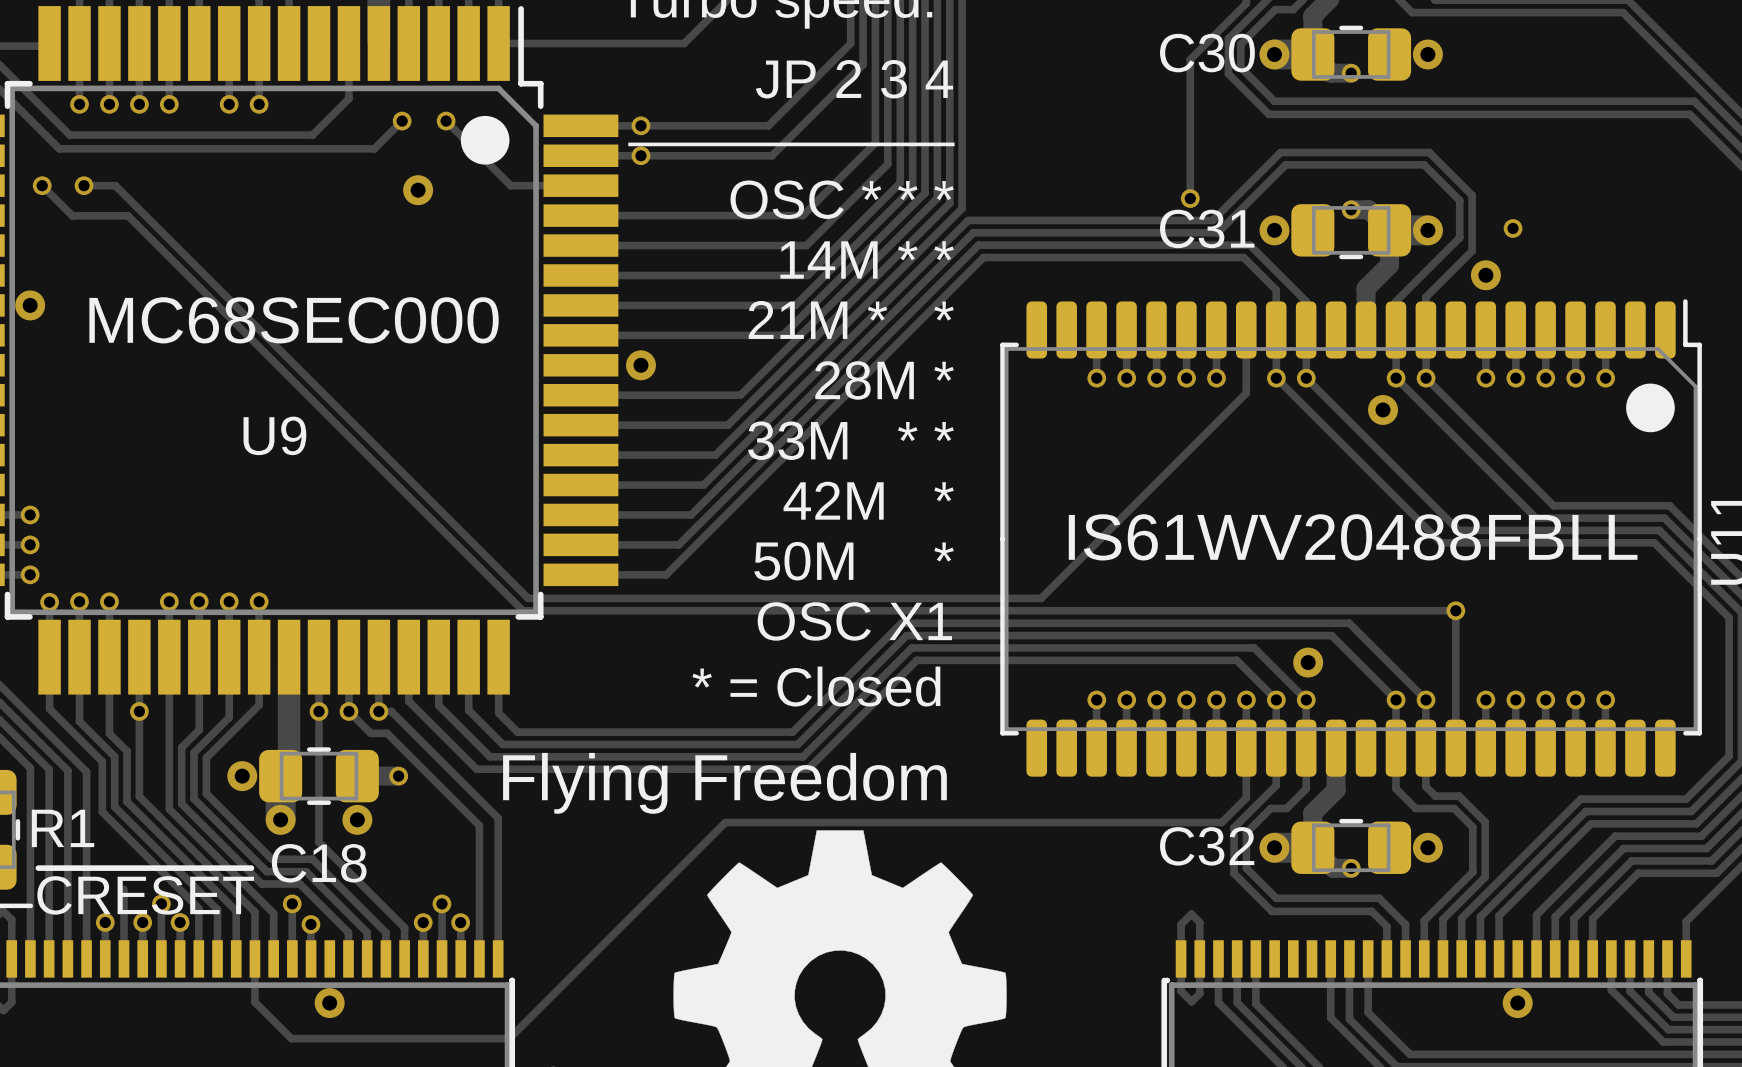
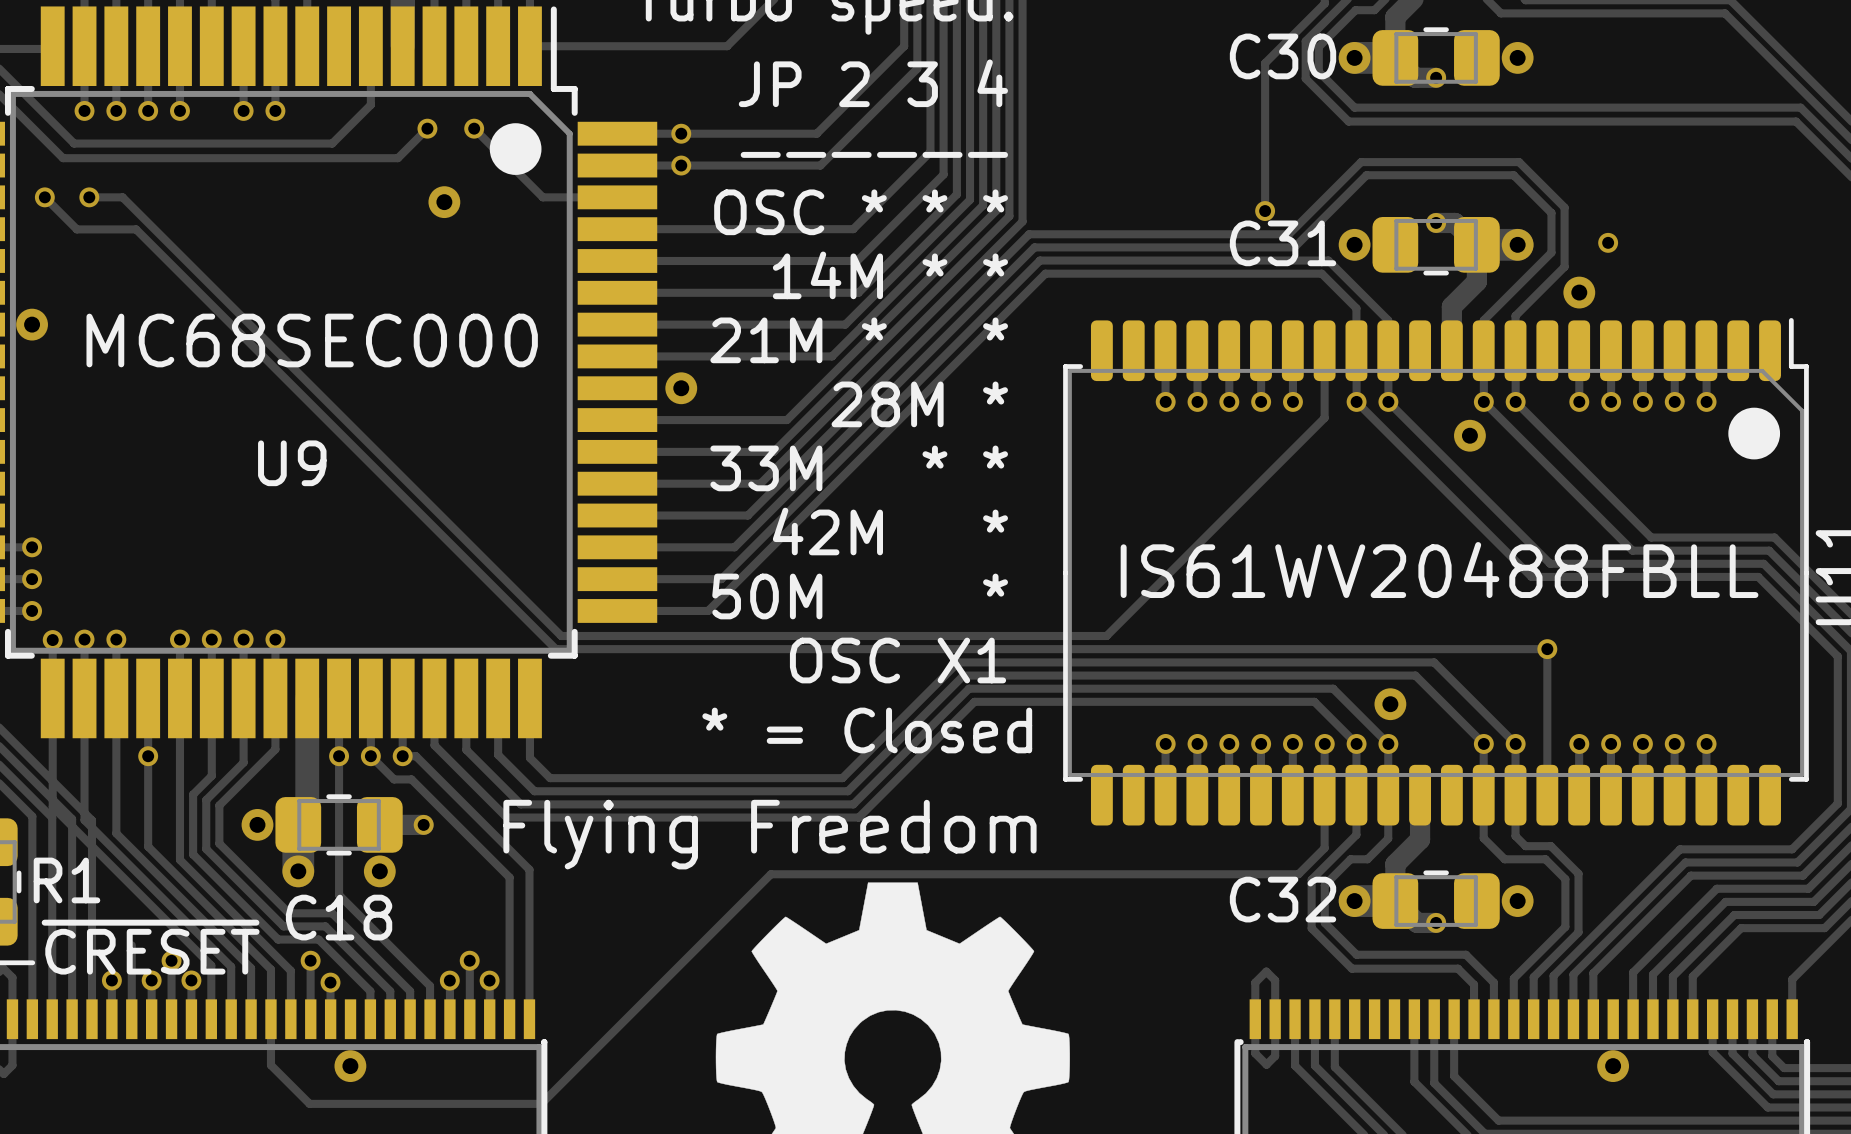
track: (49, 708) (102, 761) (102, 811) -> (52, 753) (52, 806) (108, 863)
track: (79, 721) (114, 756) (114, 806) -> (84, 766) (84, 820) (121, 857)
track: (109, 733) (127, 751) (127, 801) -> (116, 779) (116, 833) (135, 852)

